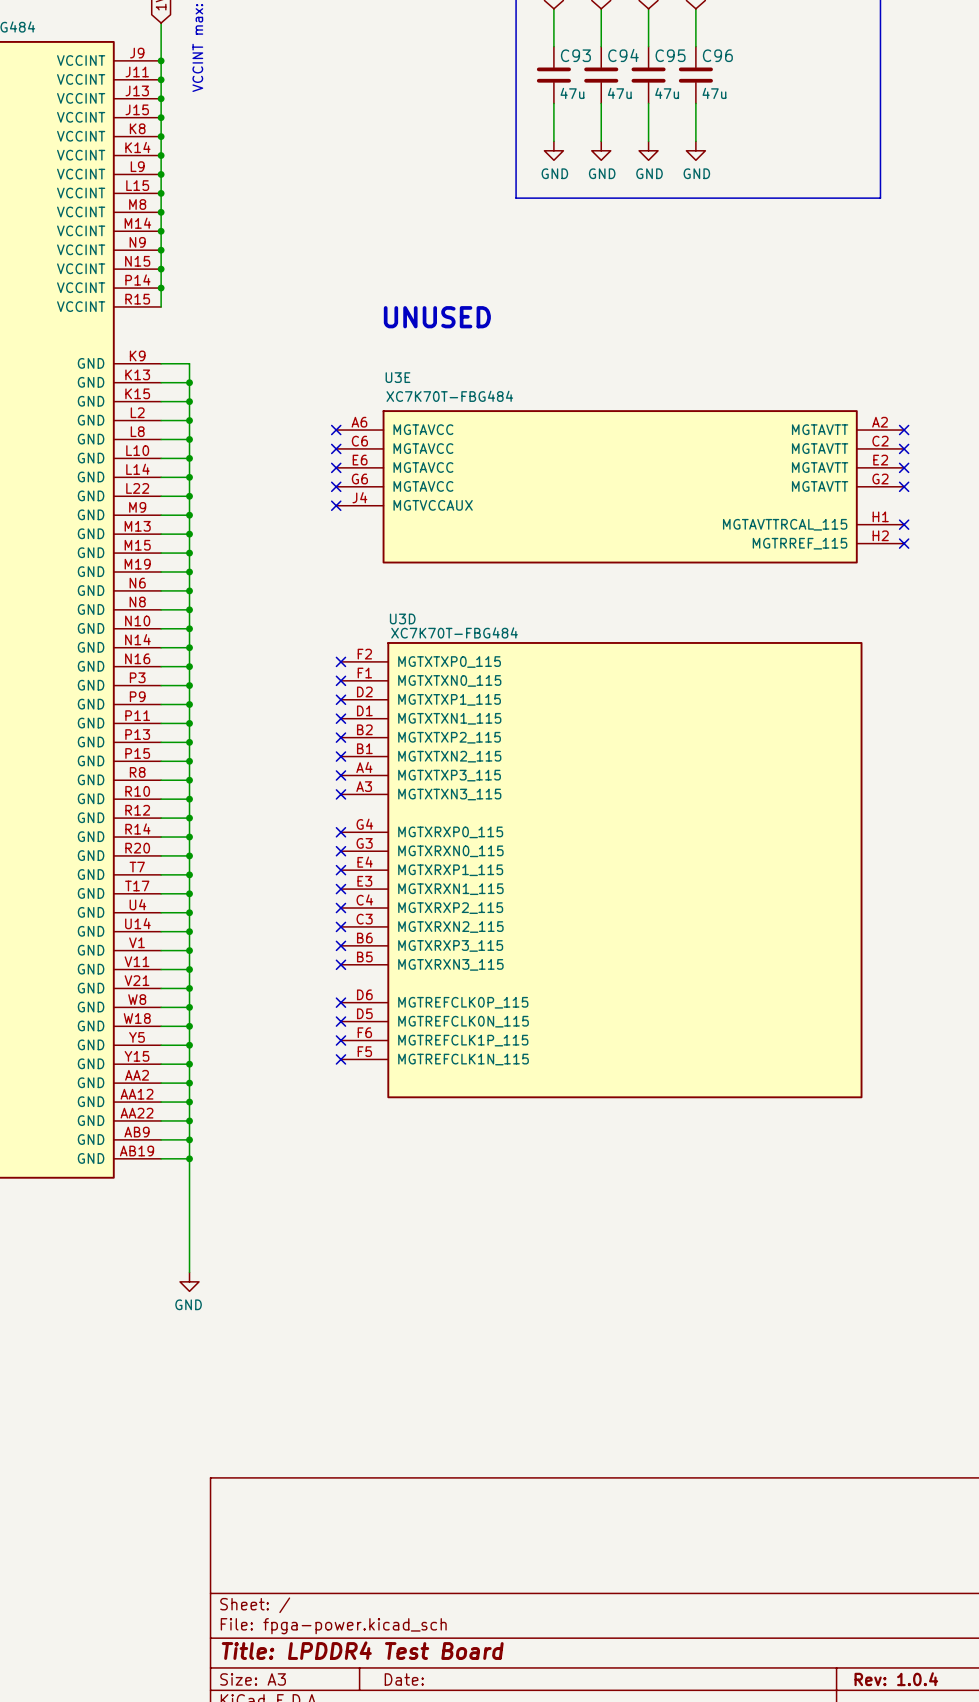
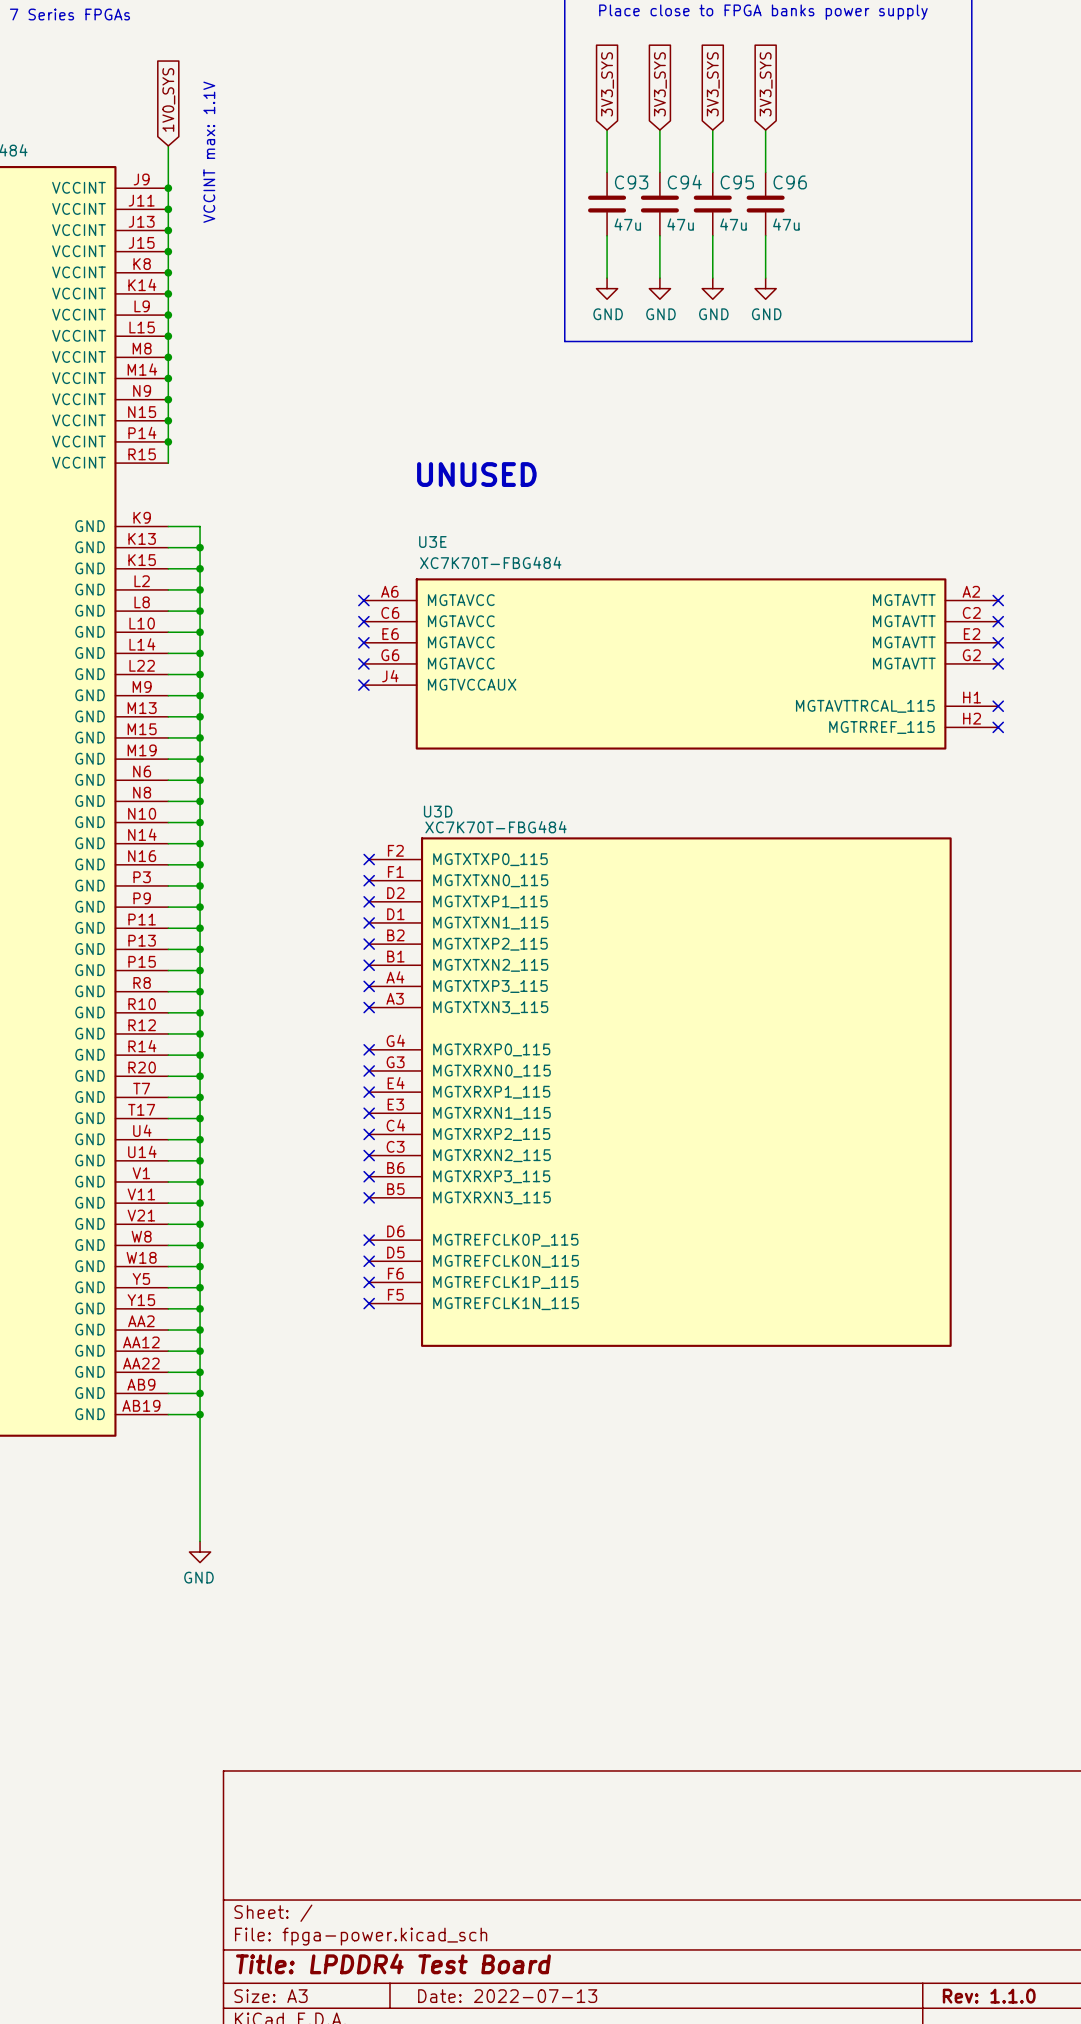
title block: Date: (404, 1679) -> Date: 2022-07-13 (507, 1996)
title block: Rev: 1.0.4 (896, 1679) -> Rev: 1.1.0 (989, 1996)

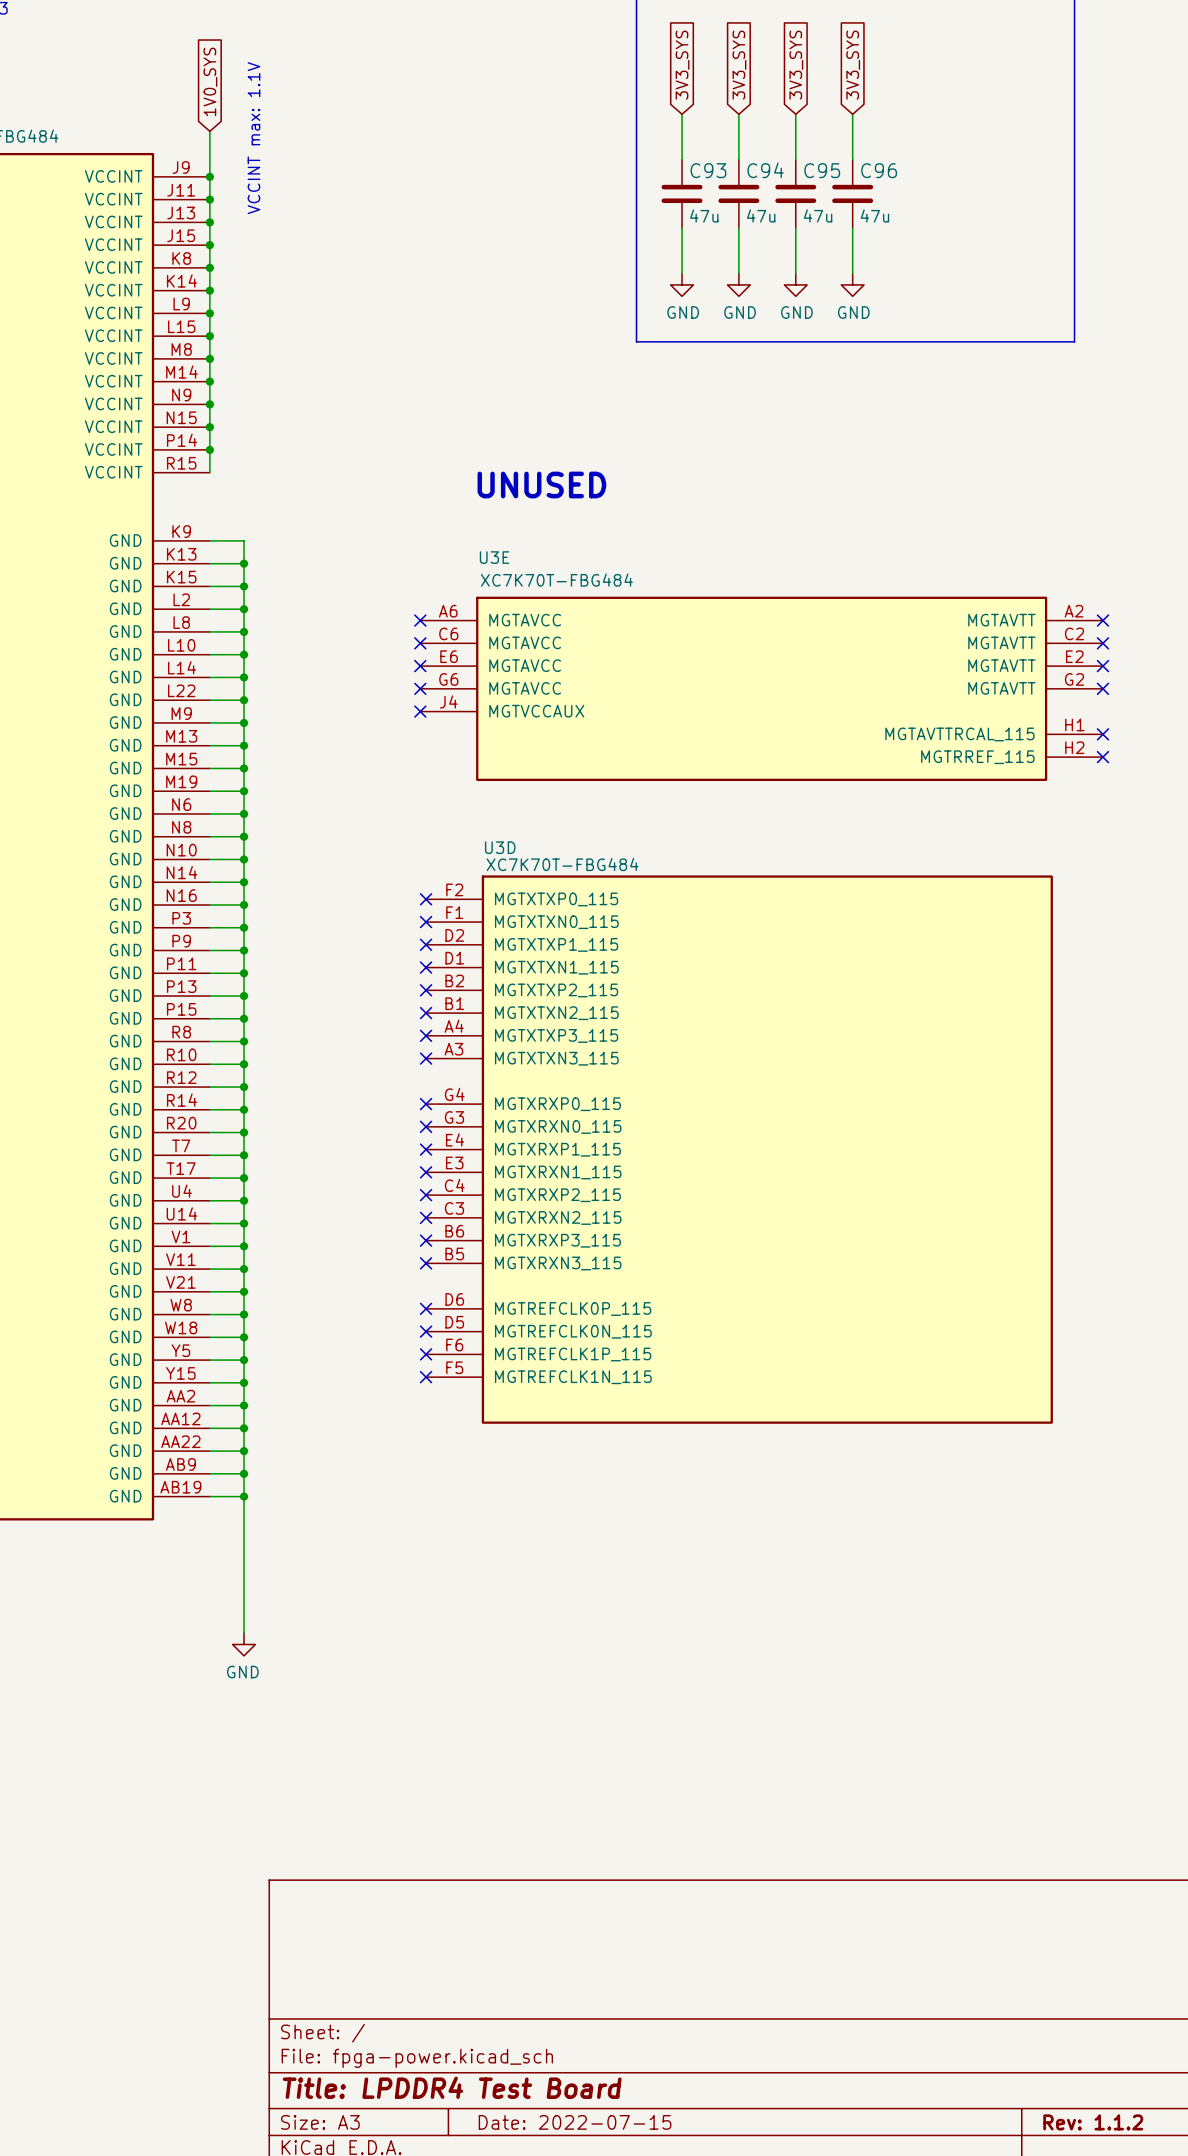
title block: Date: 2022-07-13 (507, 1996) -> Date: 2022-07-15 (575, 2122)
title block: Rev: 1.1.0 (989, 1996) -> Rev: 1.1.2 (1093, 2122)

